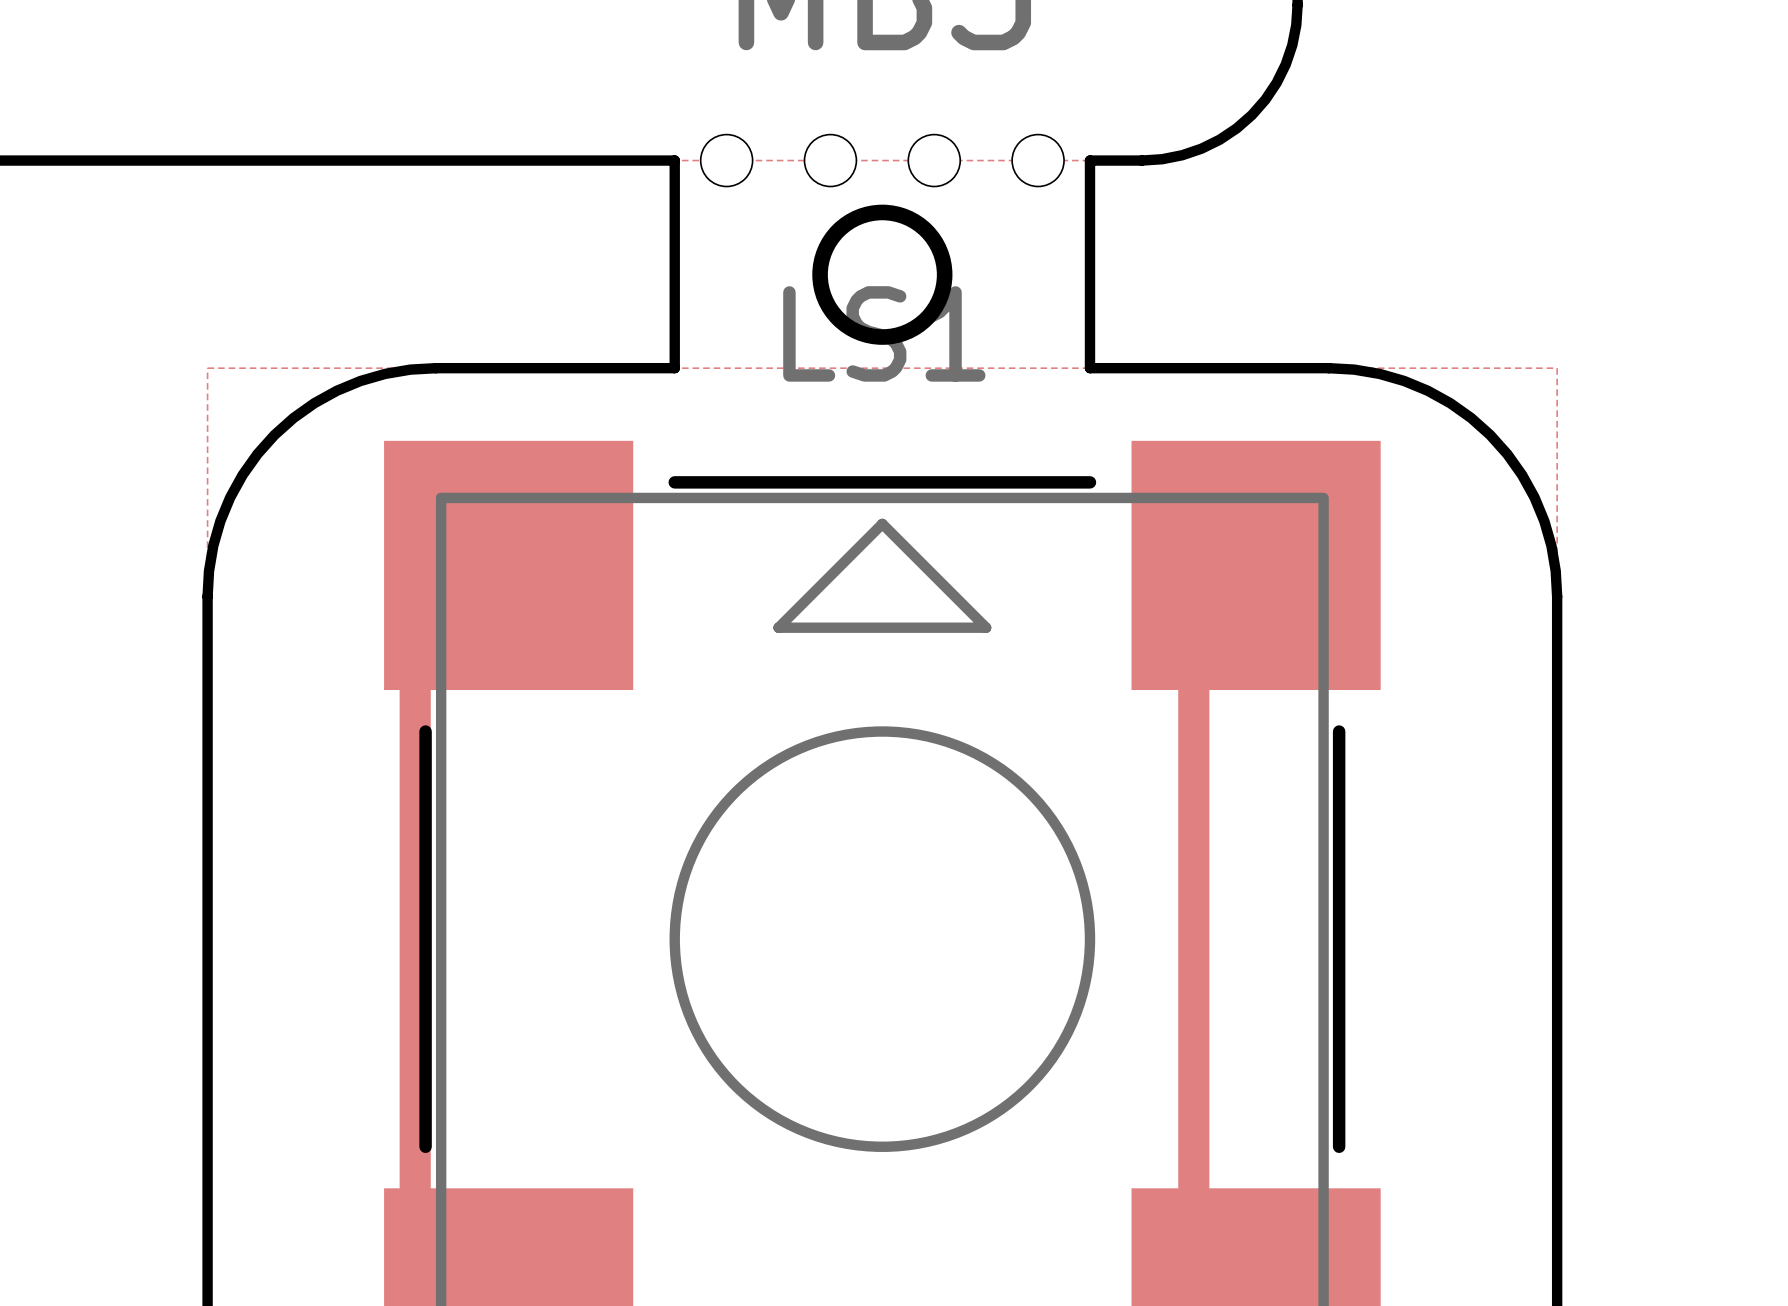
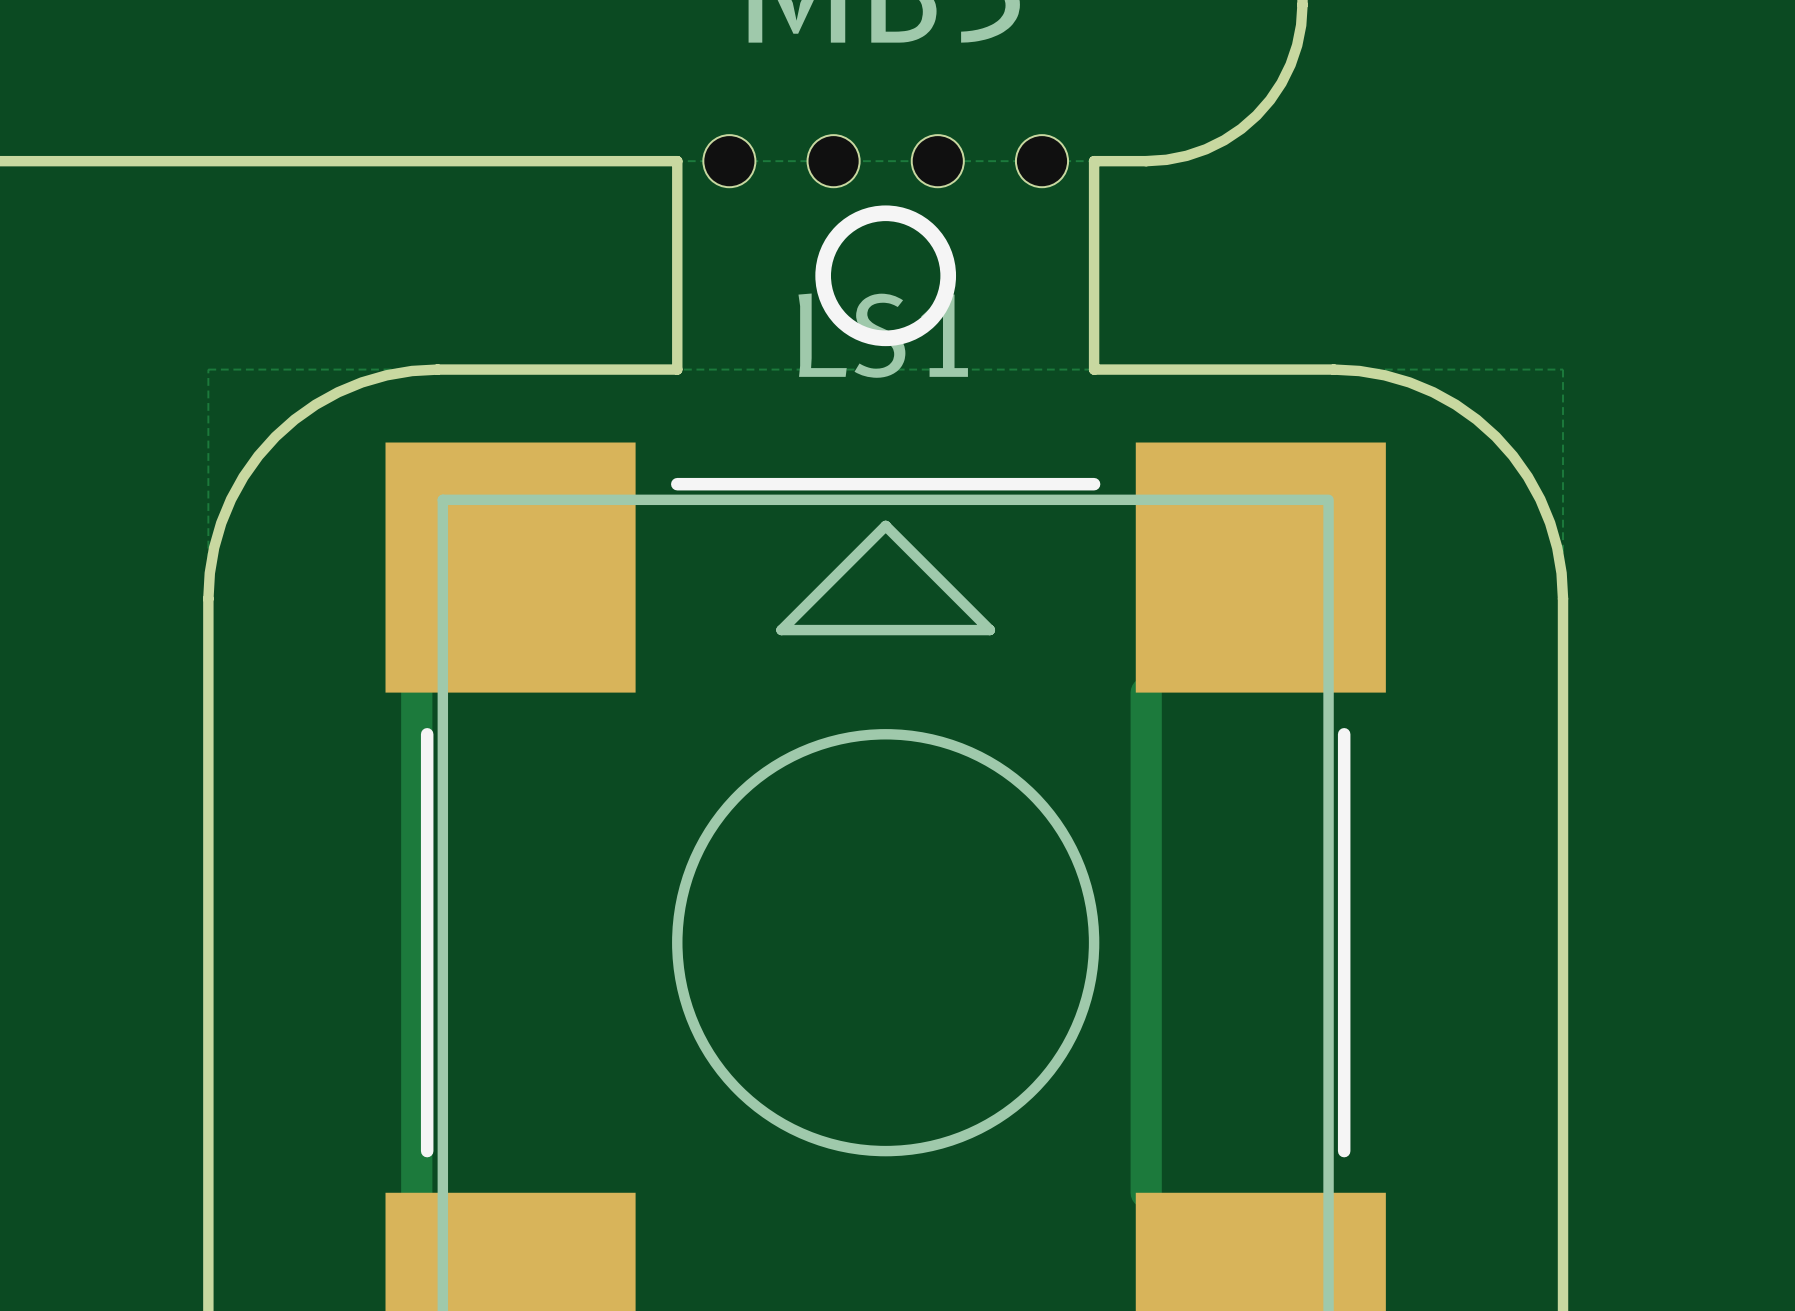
track: (1193, 690) (1193, 1188) -> (1146, 692) (1146, 1192)

